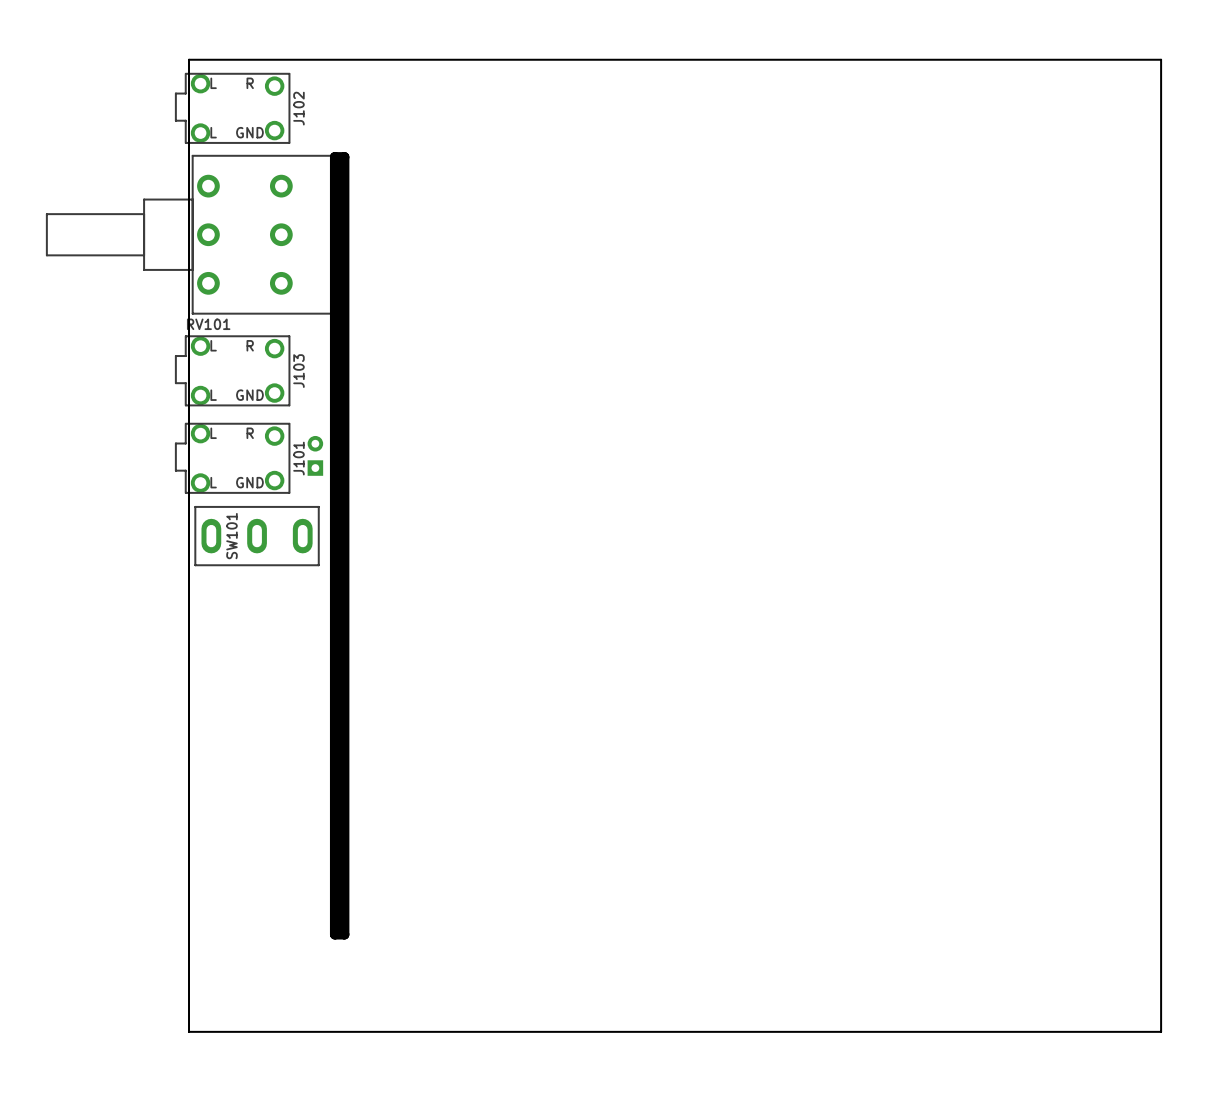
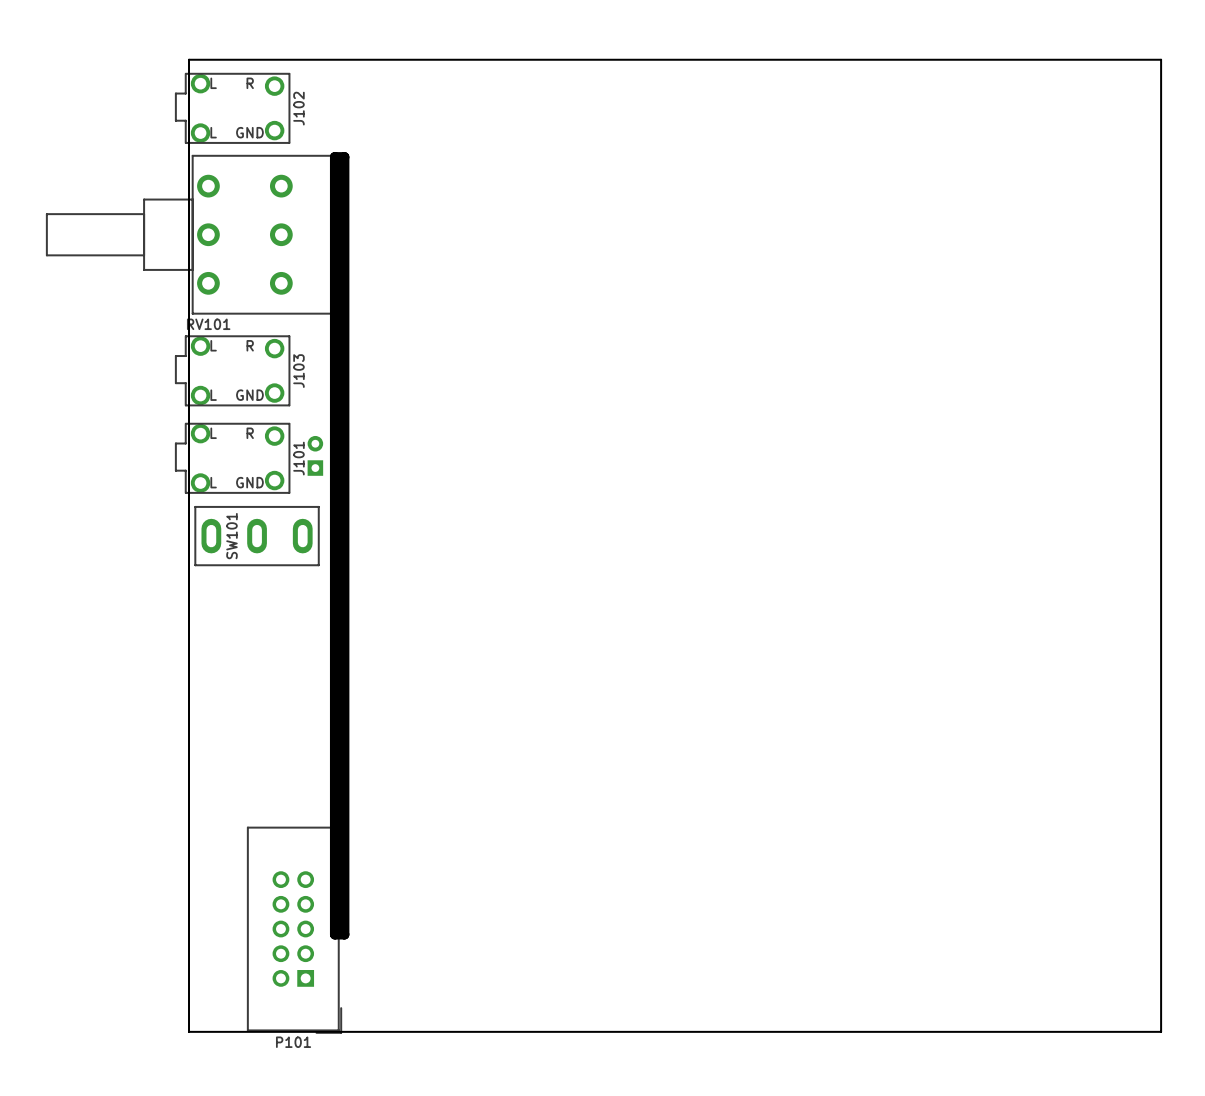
P101: none -> (294, 930)

